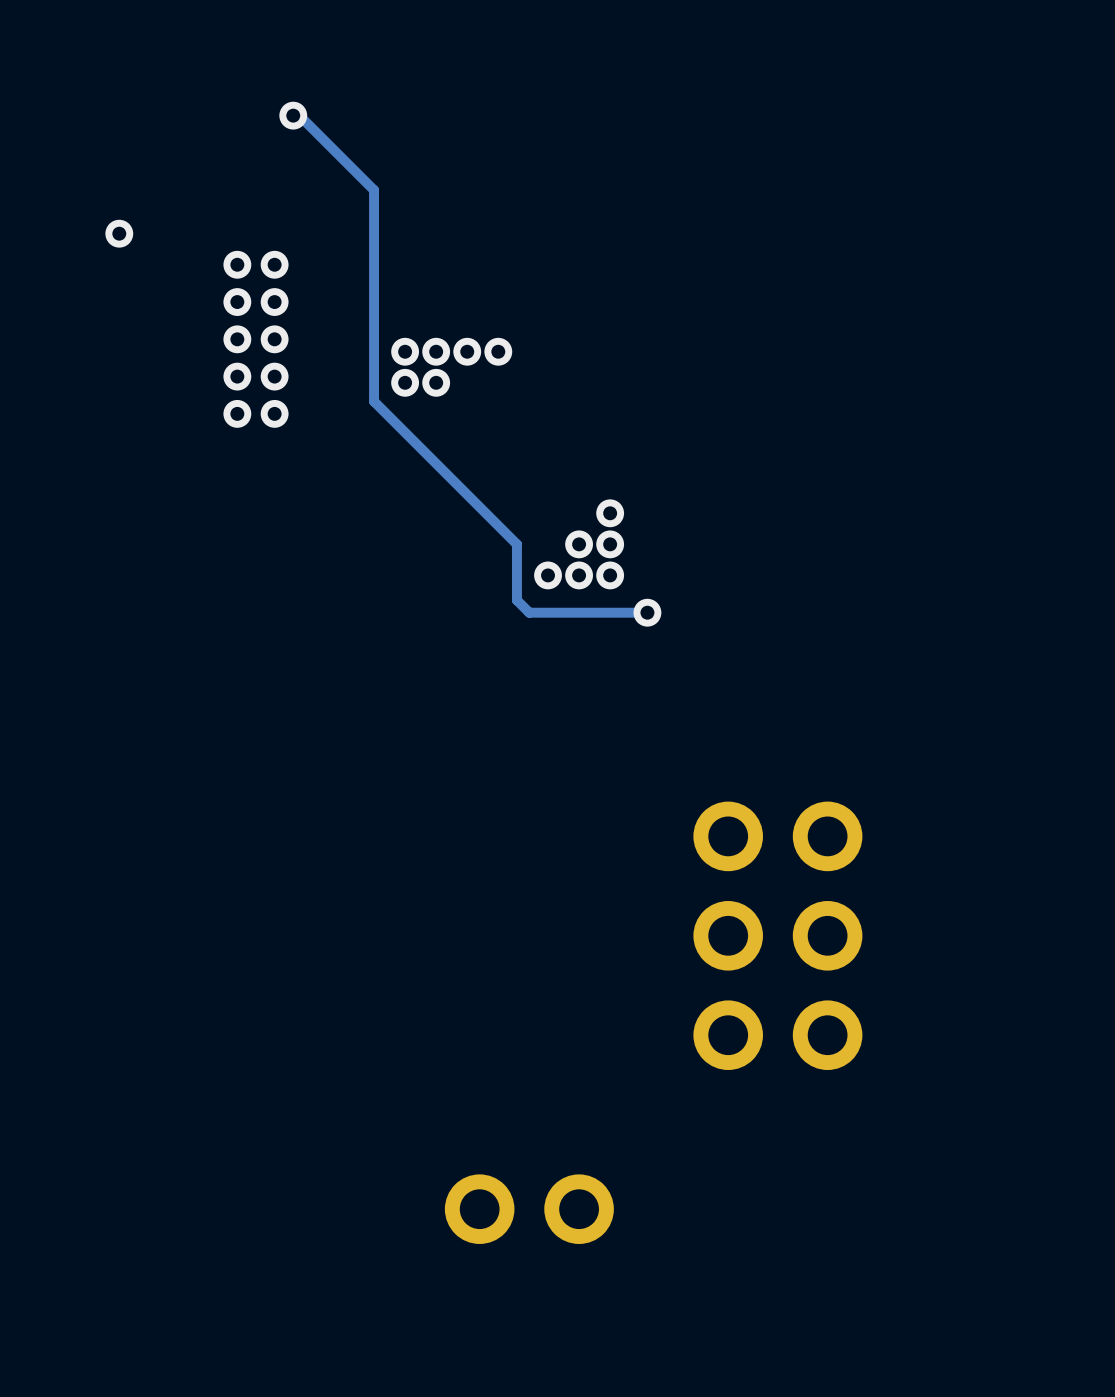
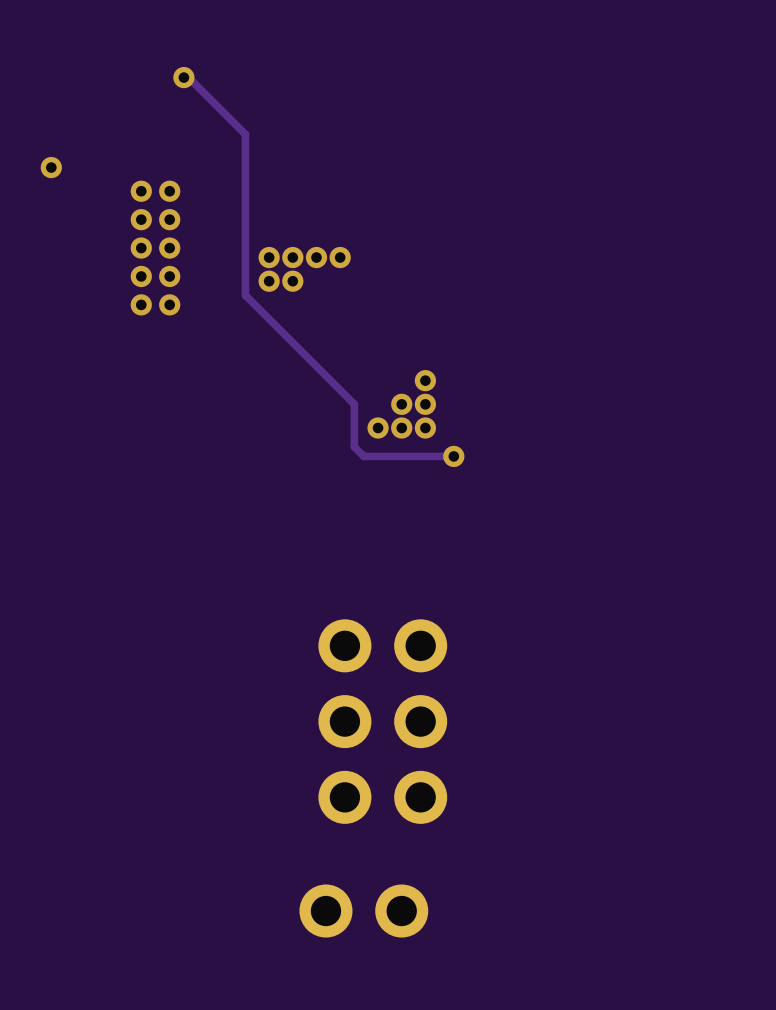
part: (728, 935) -> none
part: (827, 935) -> none
part: none -> (344, 721)
part: none -> (420, 721)

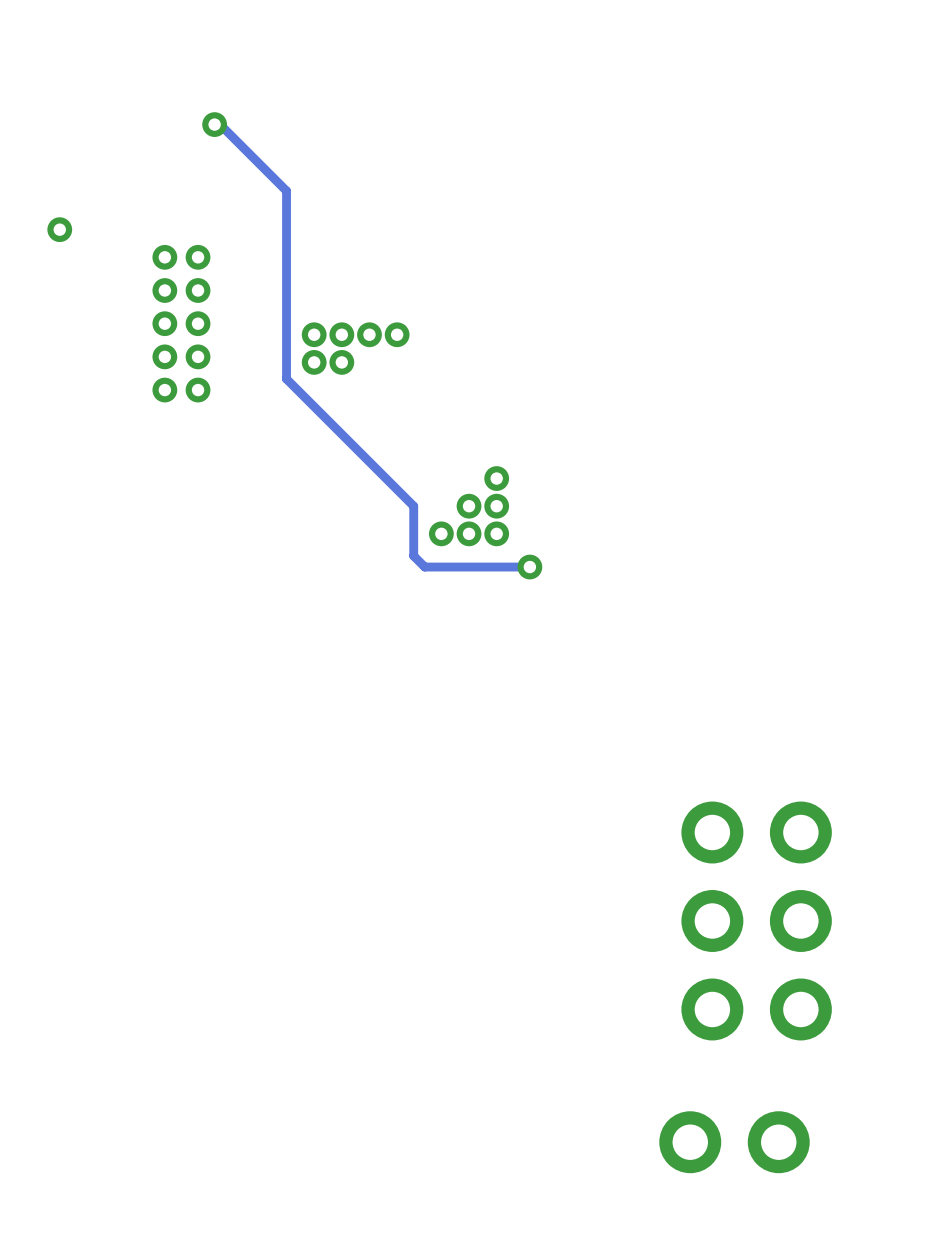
part: (344, 721) -> none
part: (420, 721) -> none
part: none -> (712, 920)
part: none -> (800, 920)
part position: (363, 911) -> (734, 1142)

